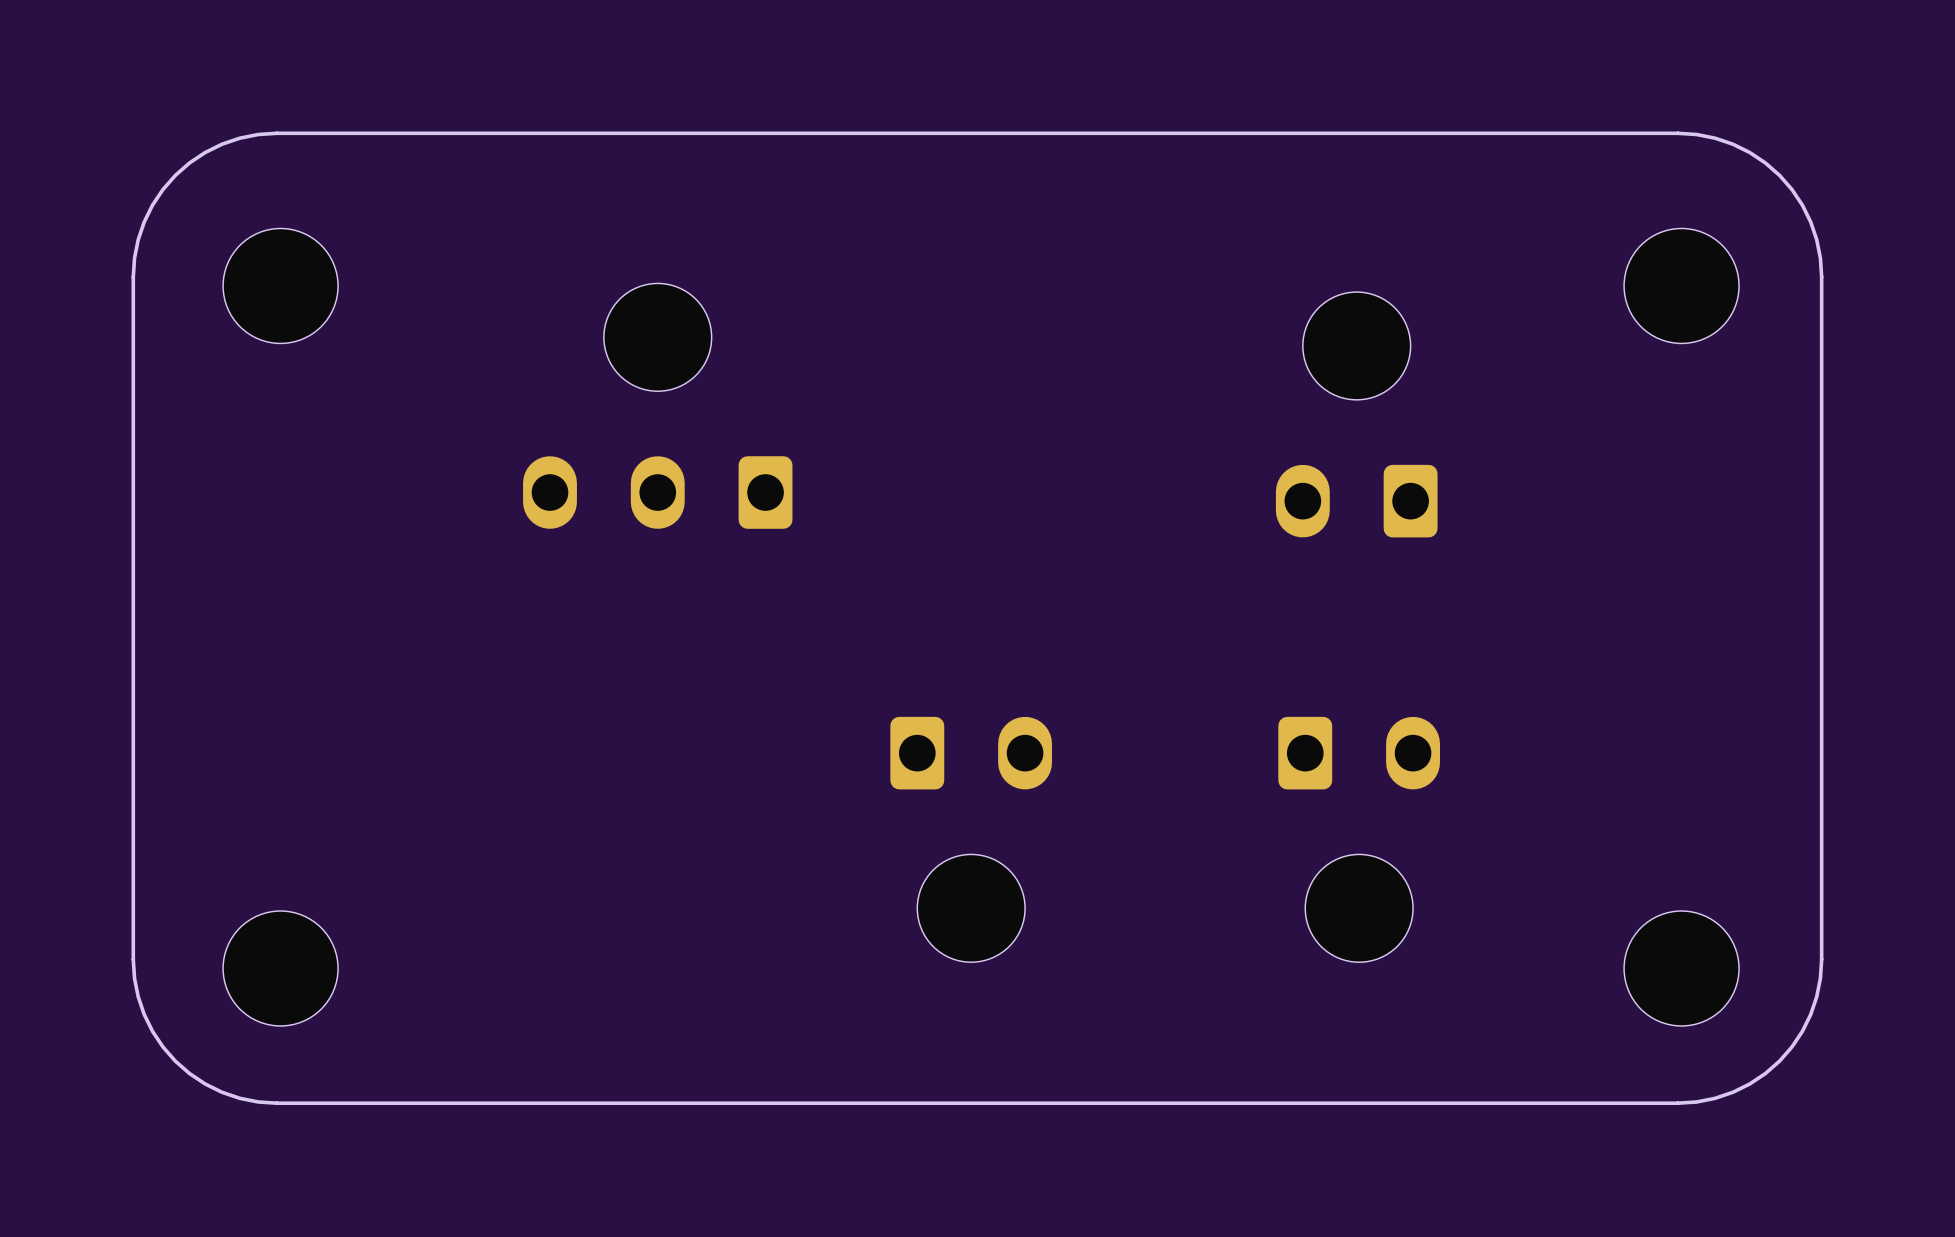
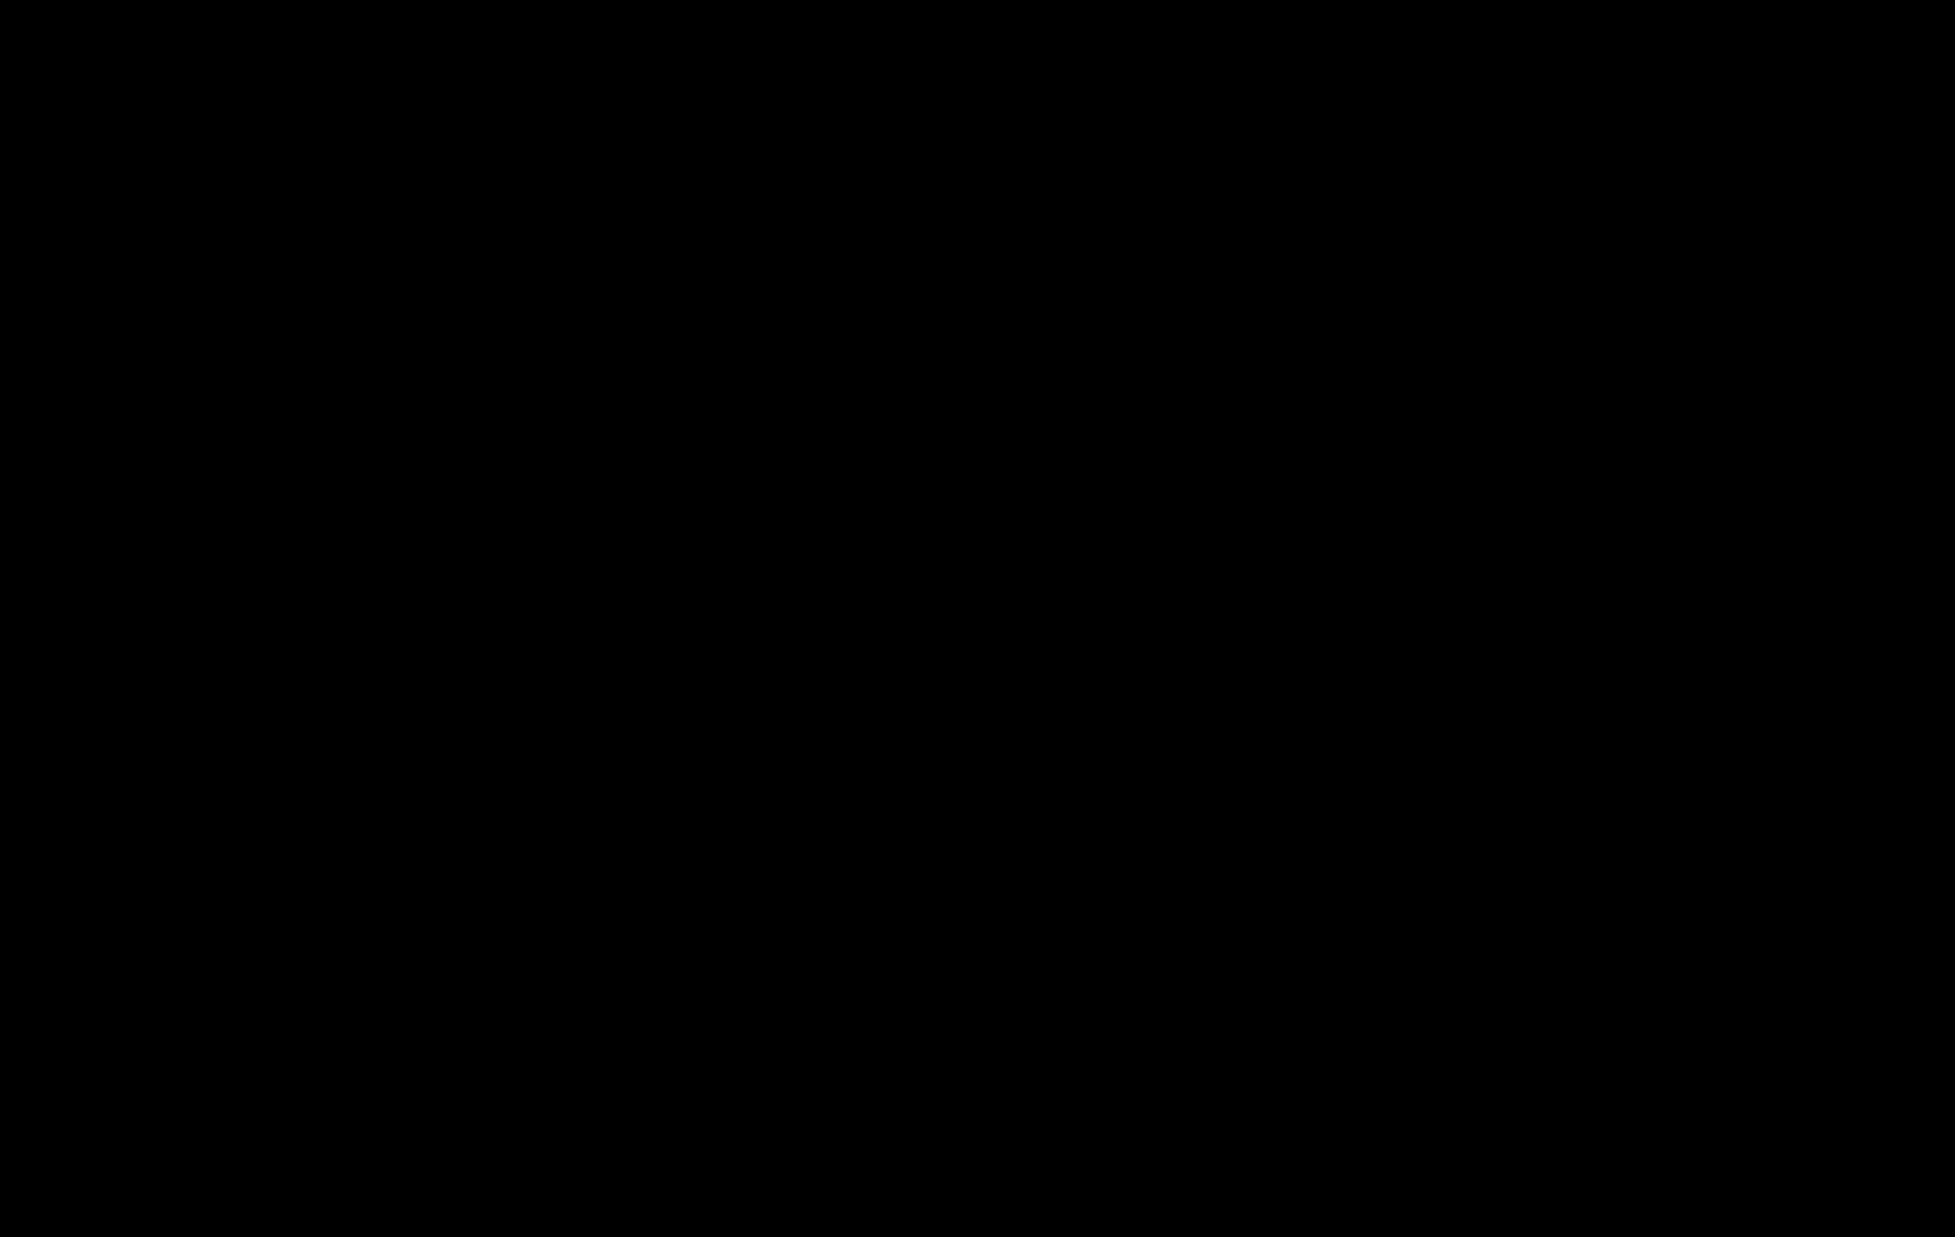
board edge: (1677, 133) (276, 133) (239, 138) (205, 152) (175, 175) (152, 205) (138, 239) (133, 276) (133, 959) (138, 996) (152, 1031) (175, 1061) (205, 1083) (239, 1098) (276, 1103) (1677, 1103) (1715, 1098) (1749, 1083) (1765, 1073) (1791, 1046) (1810, 1014) (1820, 978) (1820, 258) (1816, 239) (1802, 205) (1779, 175) (1765, 162) (1732, 144) (1715, 138) (1677, 133) -> none
part: (280, 285) -> none
part: (1681, 285) -> none
part: (657, 406) -> none
part: (1356, 414) -> none
part: (971, 839) -> none
part: (1359, 839) -> none
part: (280, 968) -> none
part: (1681, 968) -> none

